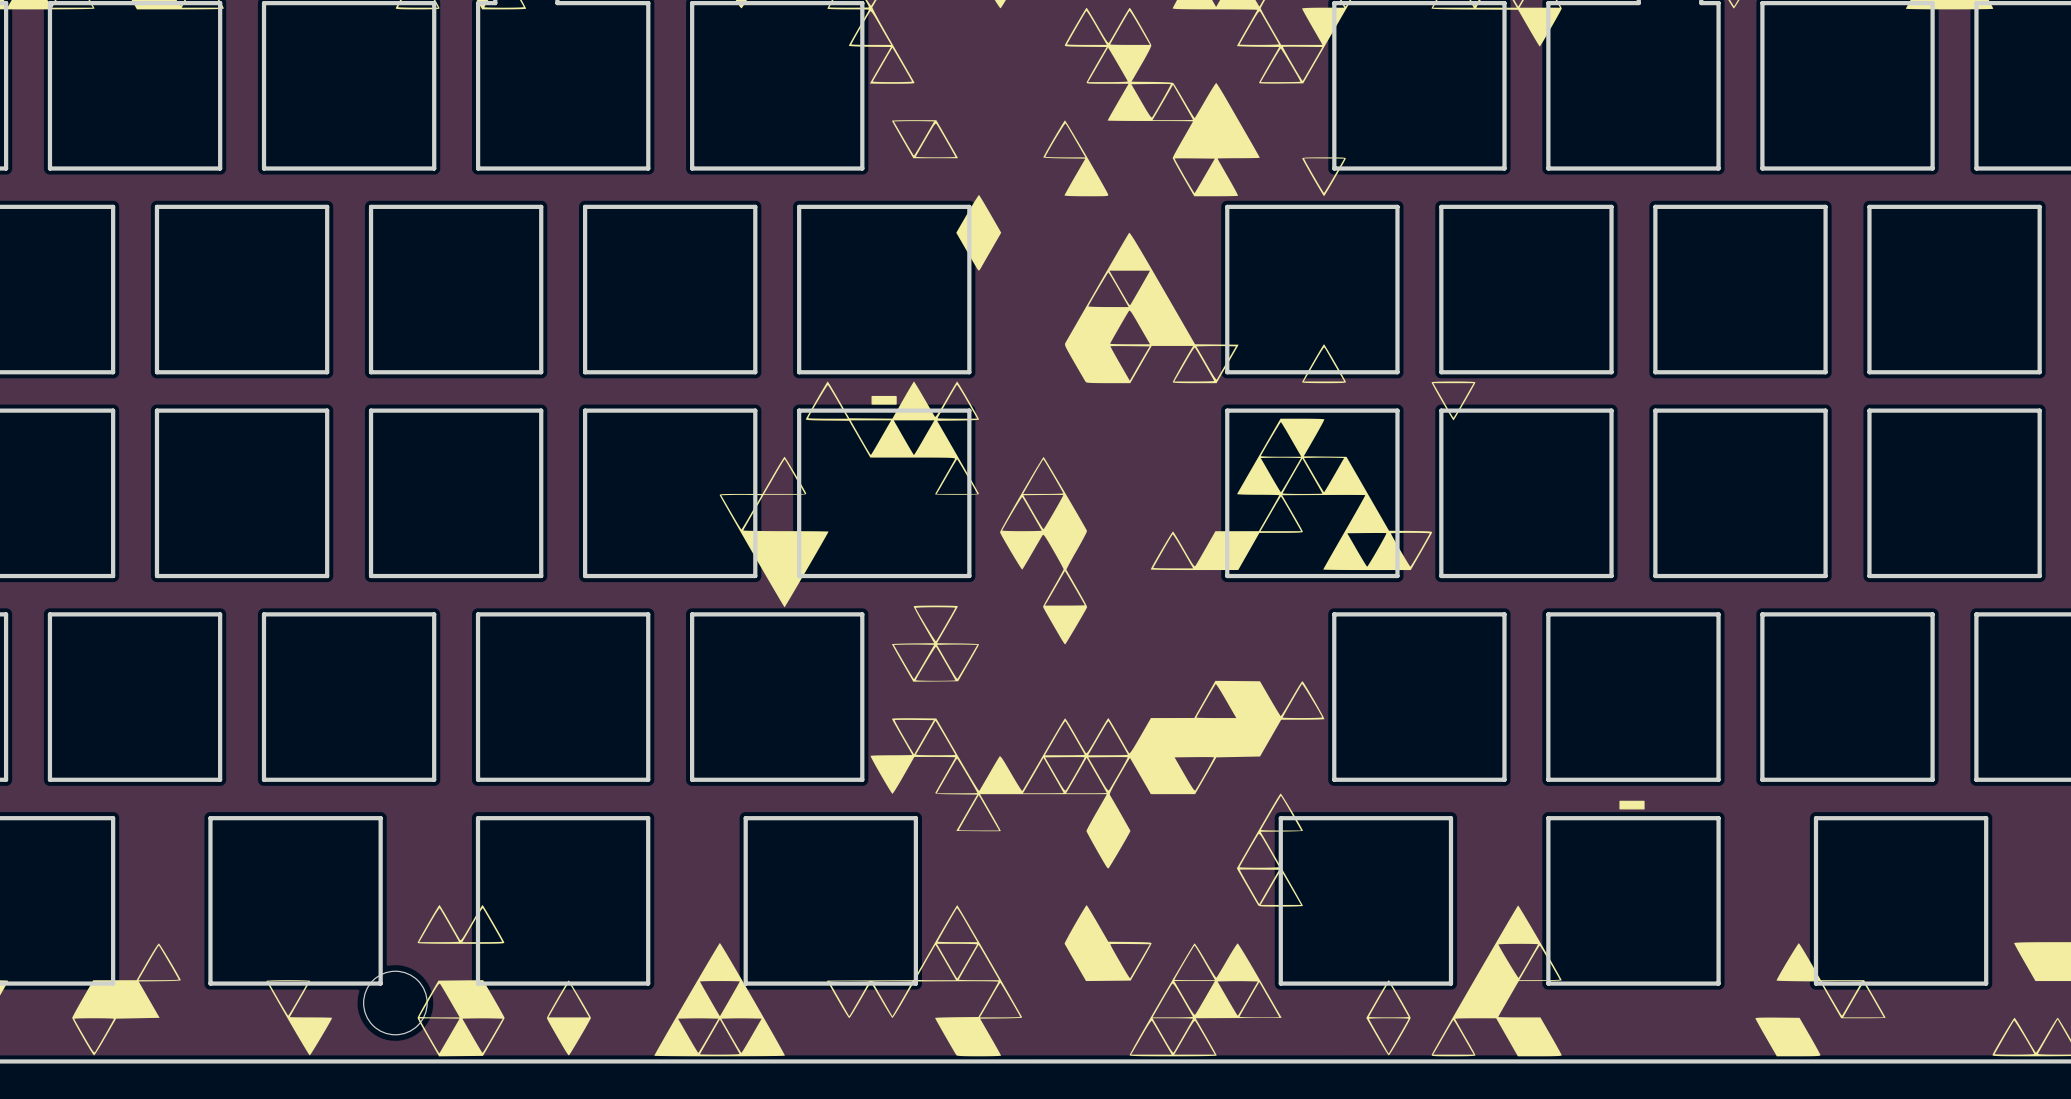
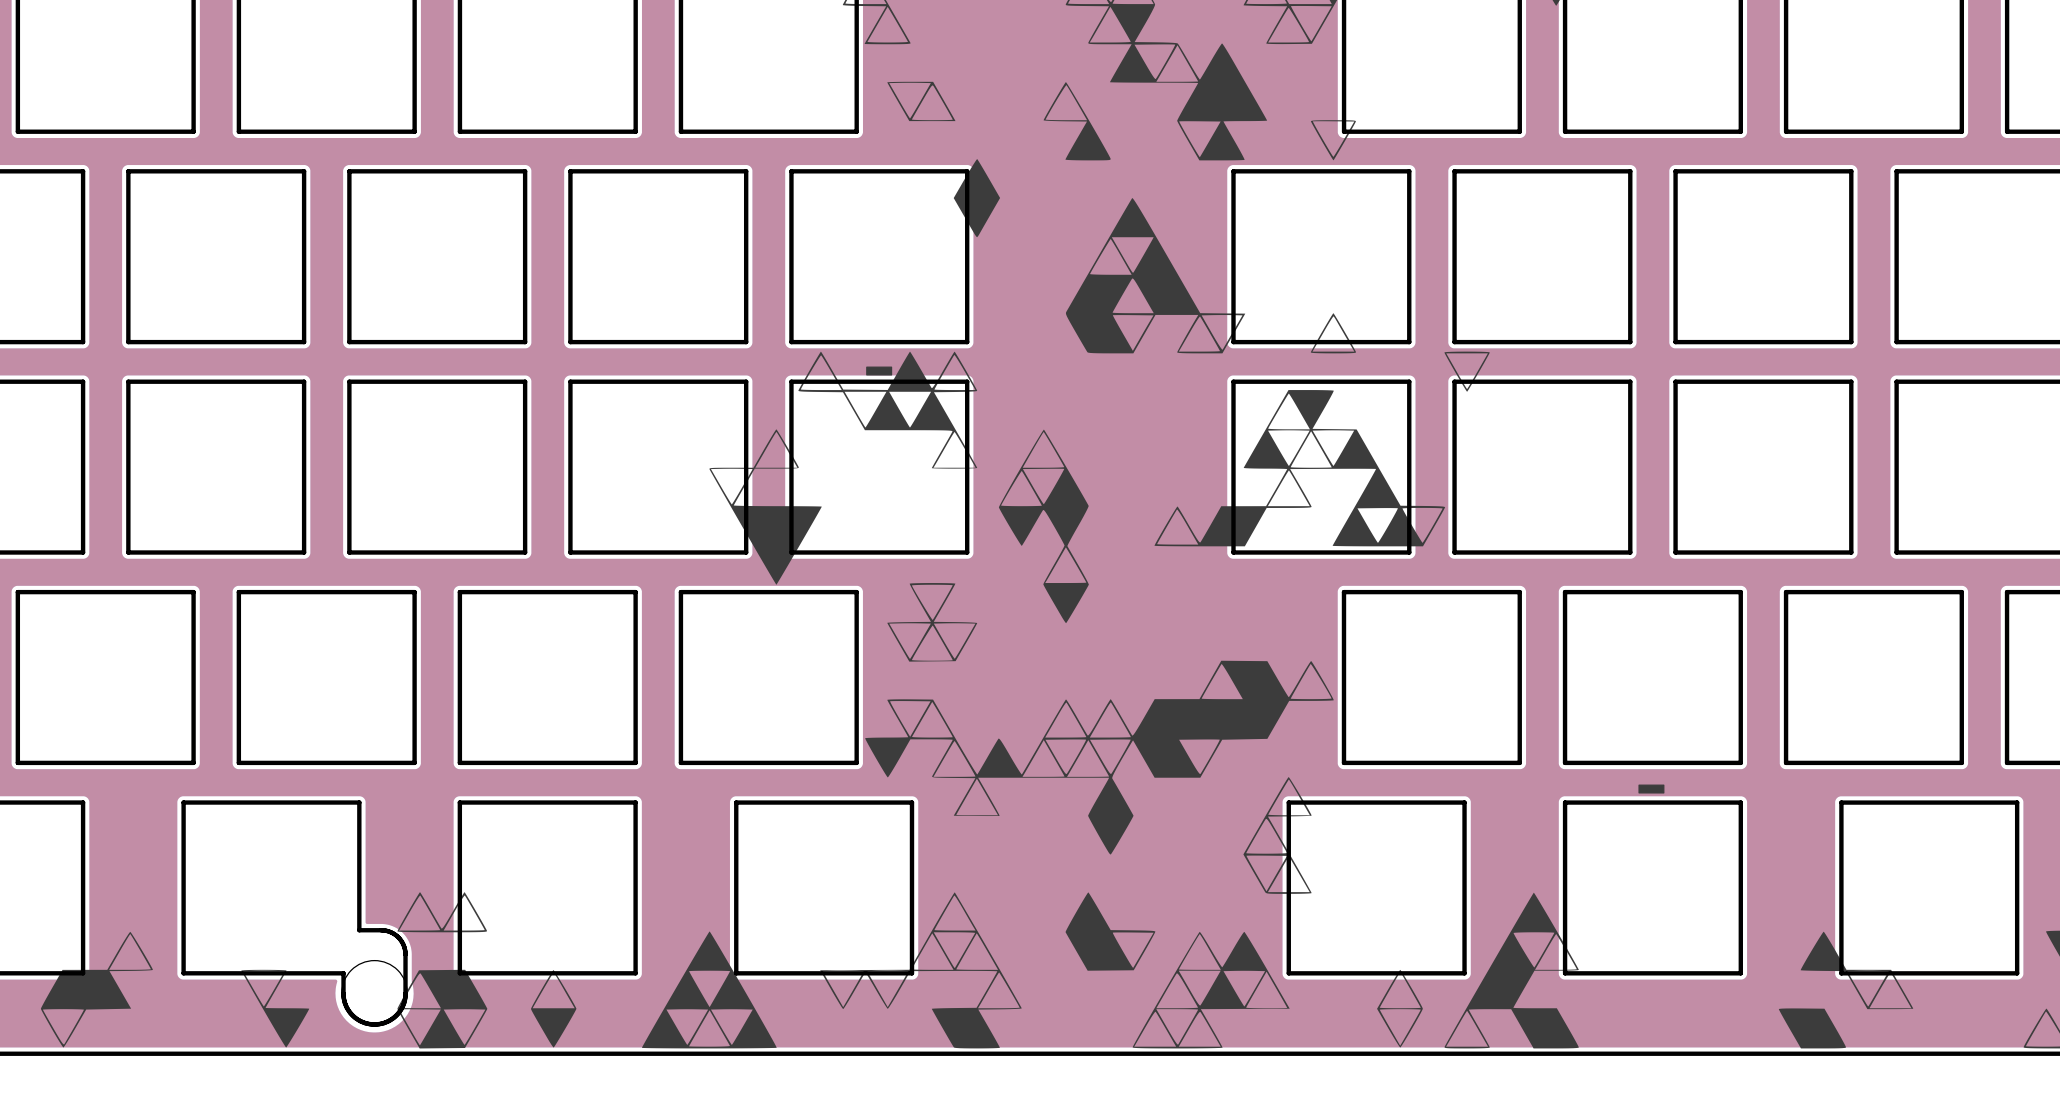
board edge: (380, 941) (380, 983) (210, 983) -> (359, 930) (390, 932) (399, 939) (404, 948) (404, 1002) (395, 1016) (382, 1023) (363, 1022) (349, 1011) (343, 998) (343, 973) (183, 973)

